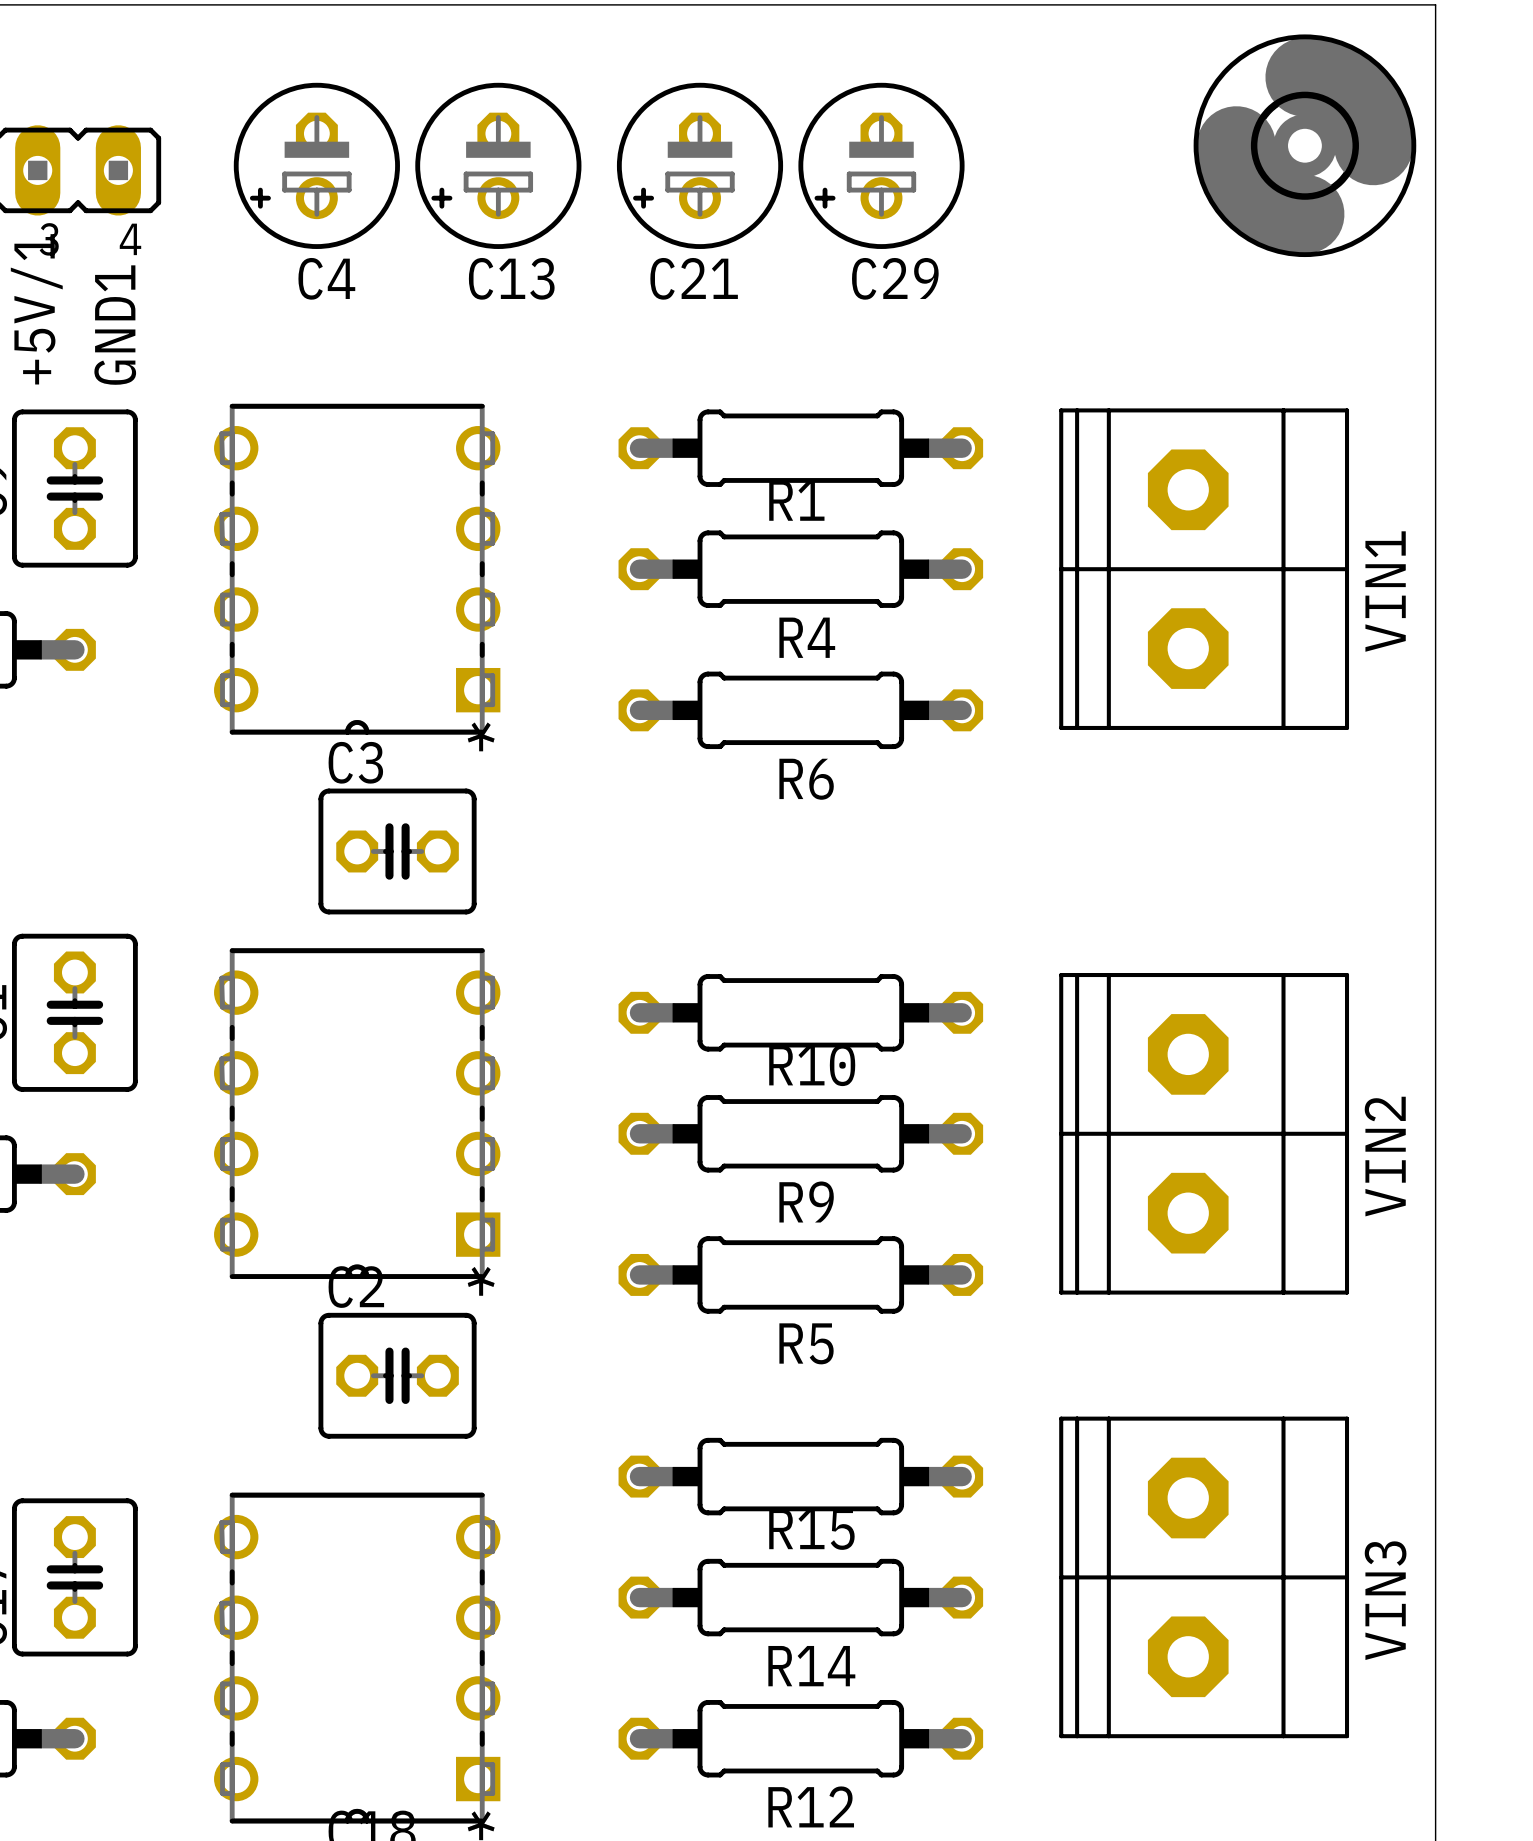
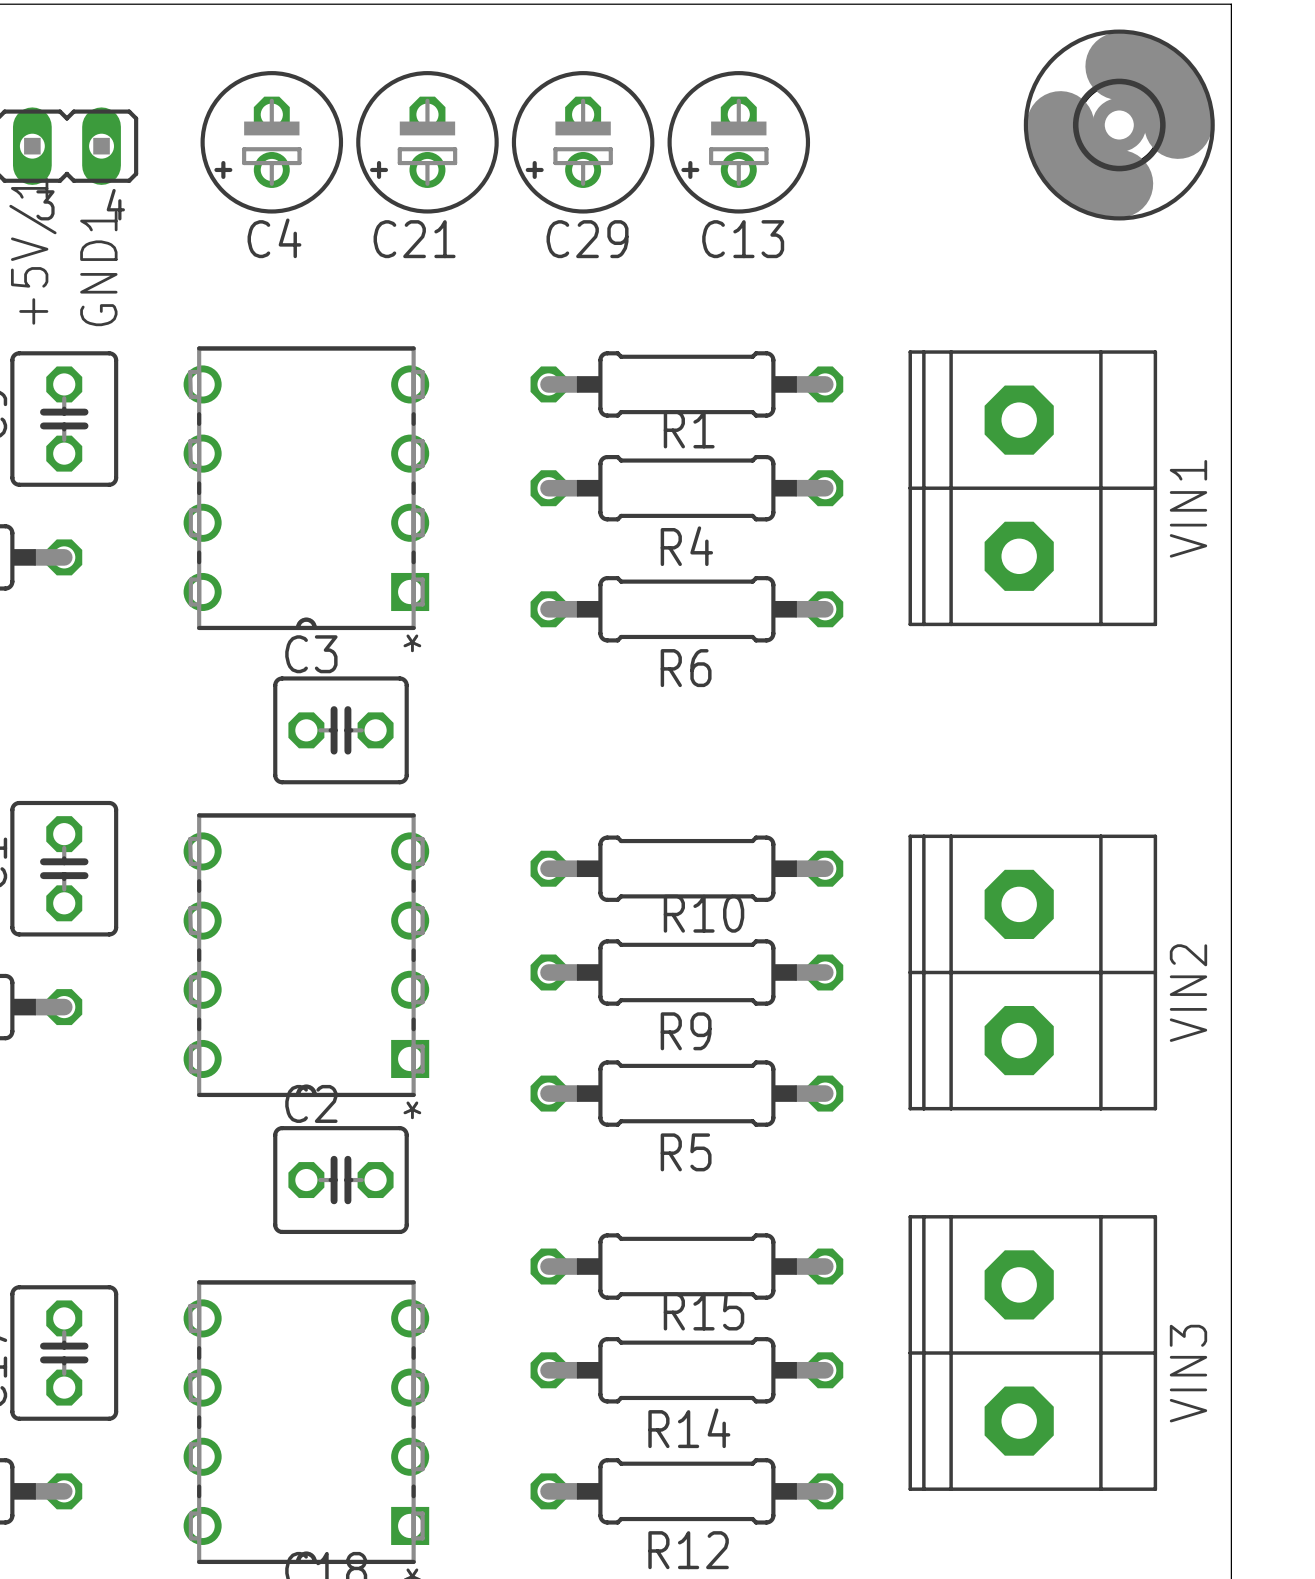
C21: (700, 165) -> none
C13: none -> (738, 142)
C29 position: (881, 165) -> (583, 142)
C13 name: C13 (511, 278) -> C21 (414, 239)

